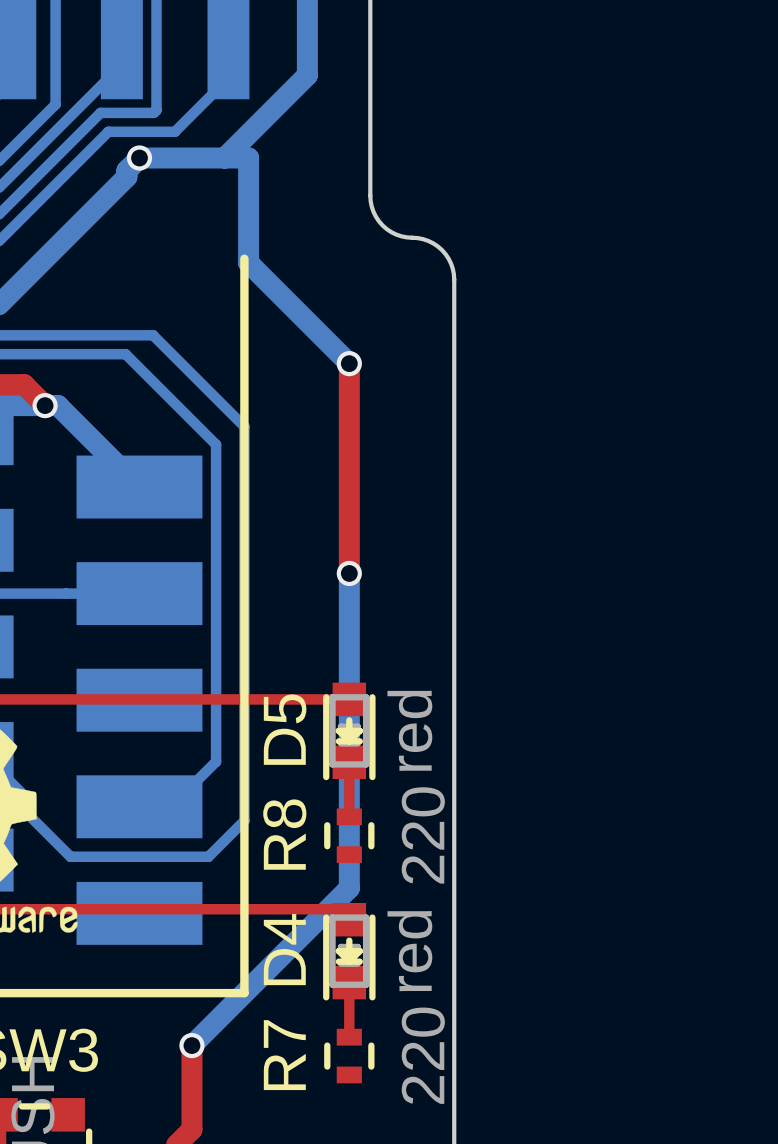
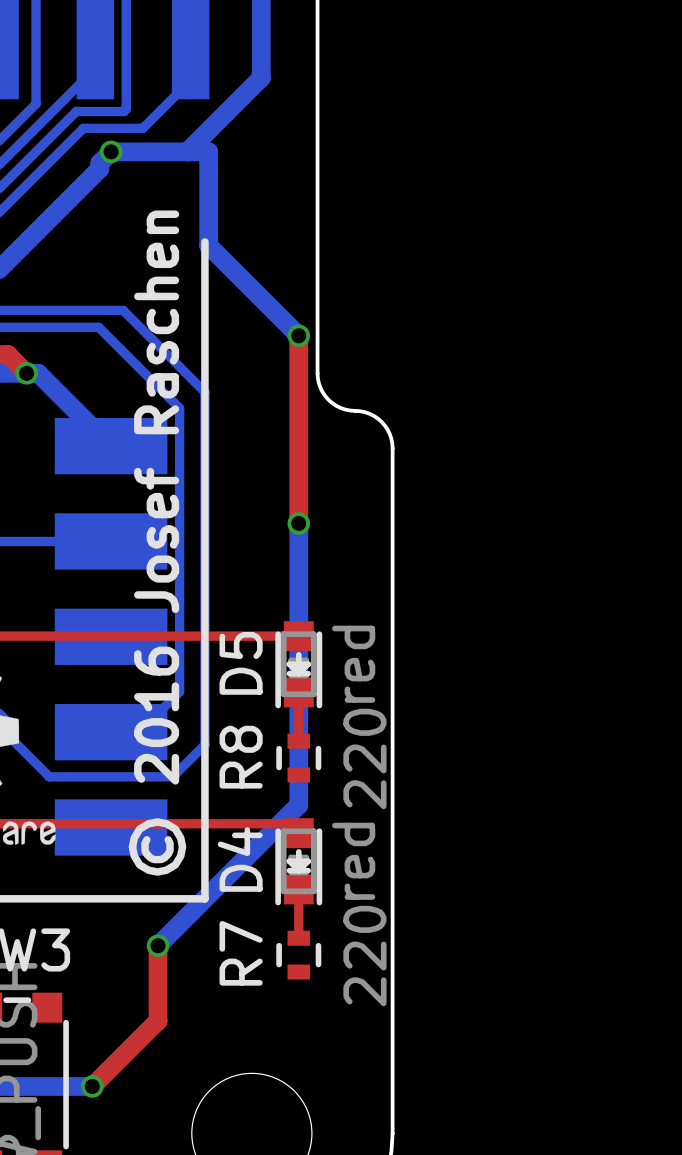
board edge: (370, 195) (373, 211) (382, 225) (396, 234) (423, 239) (433, 243) (445, 254) (452, 268) (454, 489) -> (317, 185) (318, 383) (325, 396) (336, 405) (345, 409) (369, 413) (381, 421) (389, 434) (392, 448)
text: none -> © 2016 Josef Raschen (157, 543)

